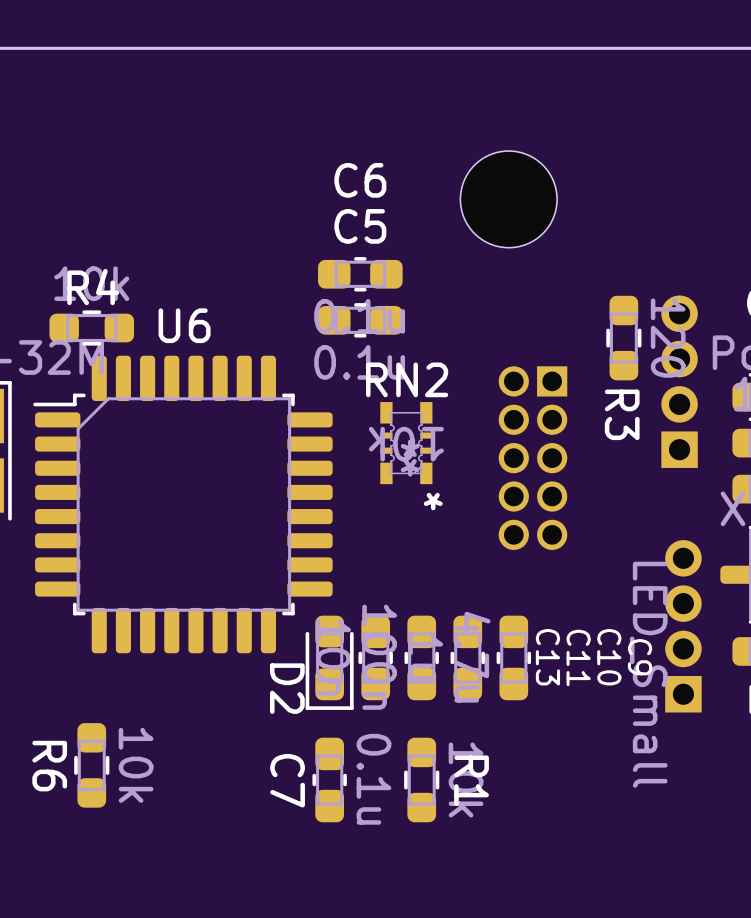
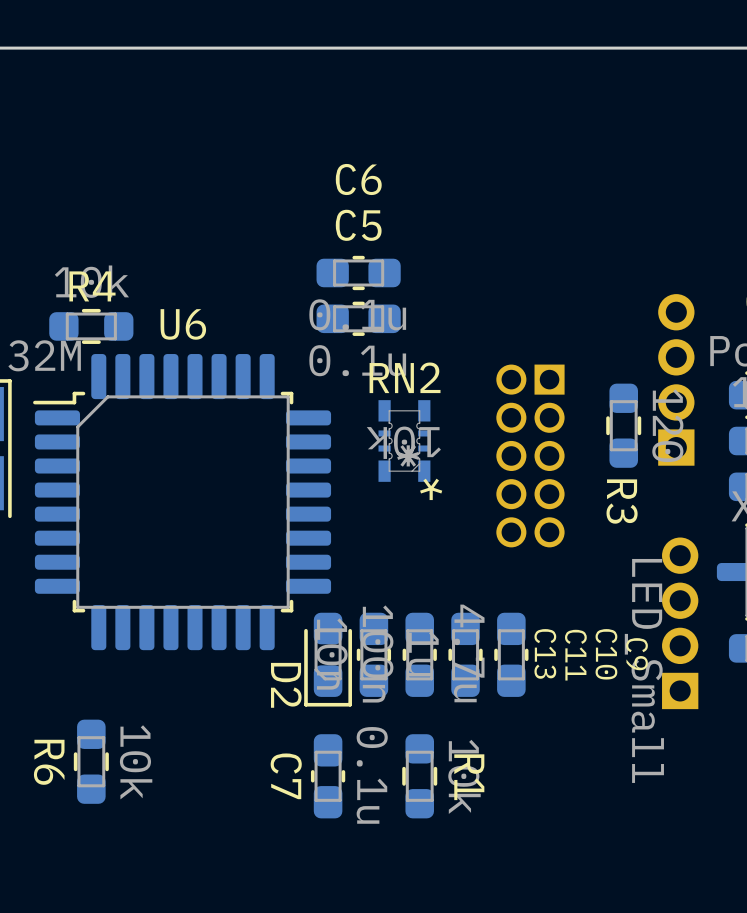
part: (508, 199) -> none
R3 position: (623, 338) -> (623, 425)

